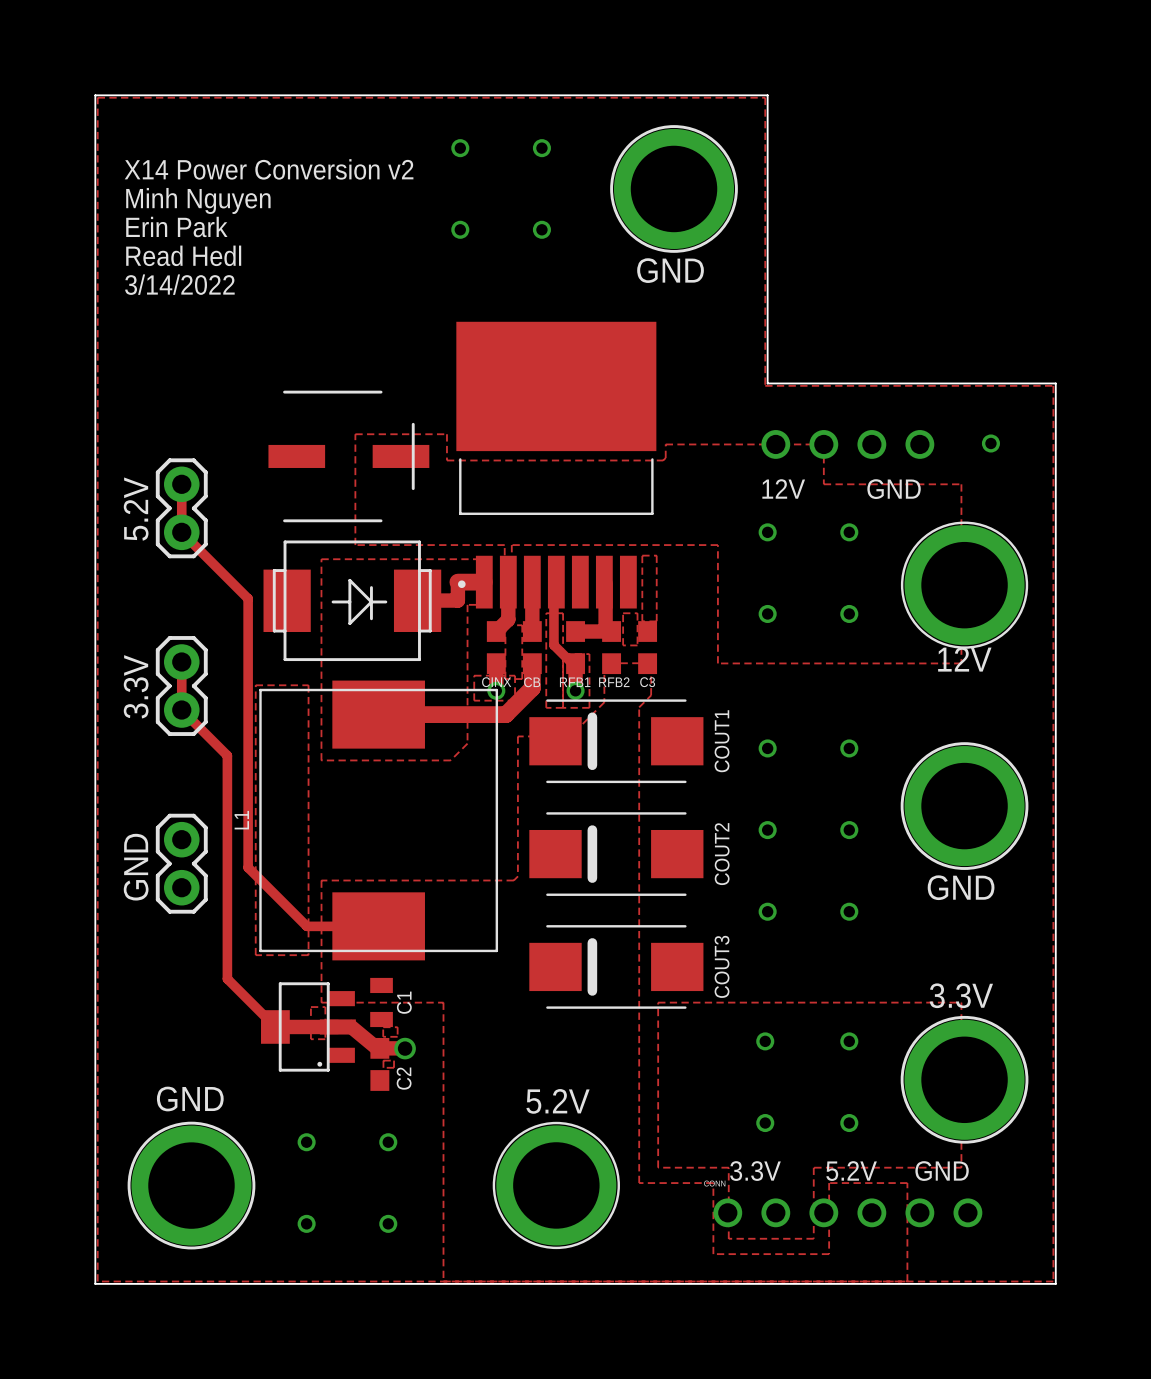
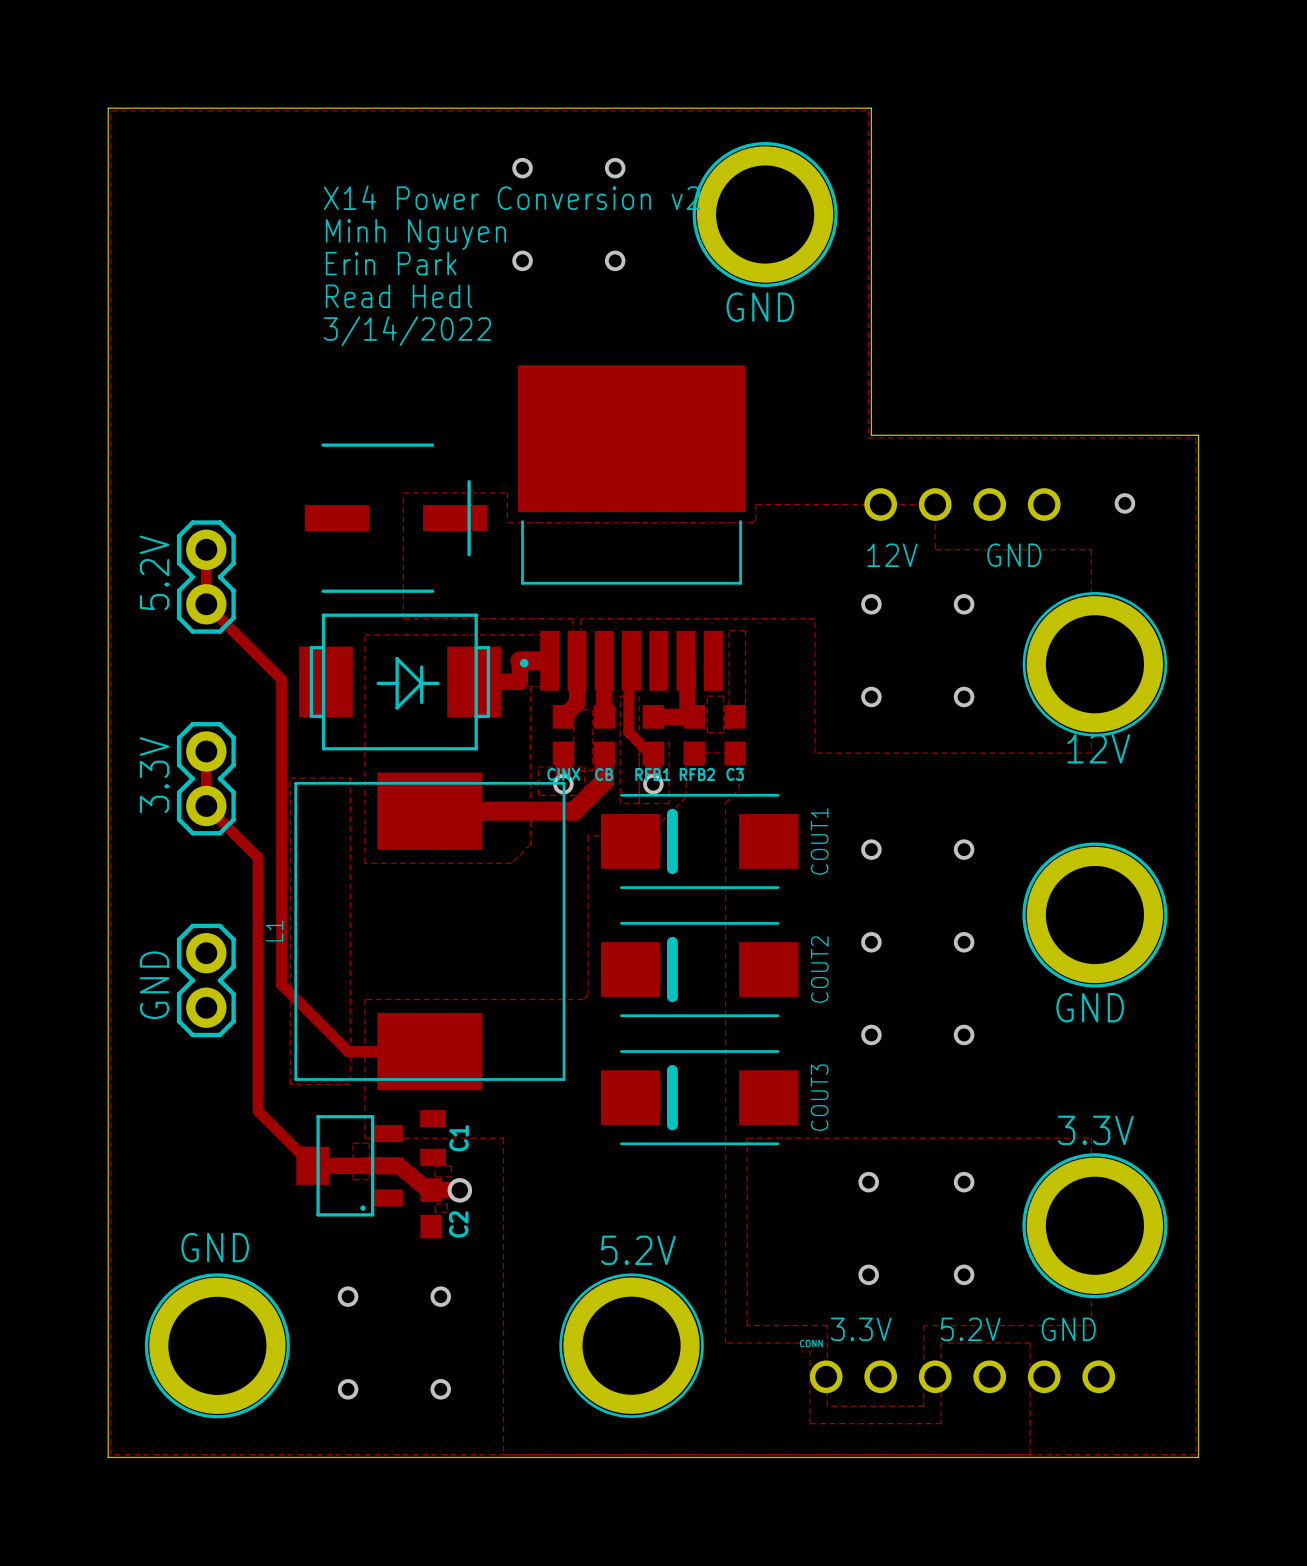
text position: X14 Power Conversion v2 (269, 169) -> X14 Power Conversion v2 (512, 197)
text position: Minh Nguyen (198, 200) -> Minh Nguyen (415, 234)
text position: Erin Park (176, 227) -> Erin Park (391, 263)
text position: Read Hedl (183, 255) -> Read Hedl (399, 296)
text position: 3/14/2022 (179, 284) -> 3/14/2022 (407, 331)

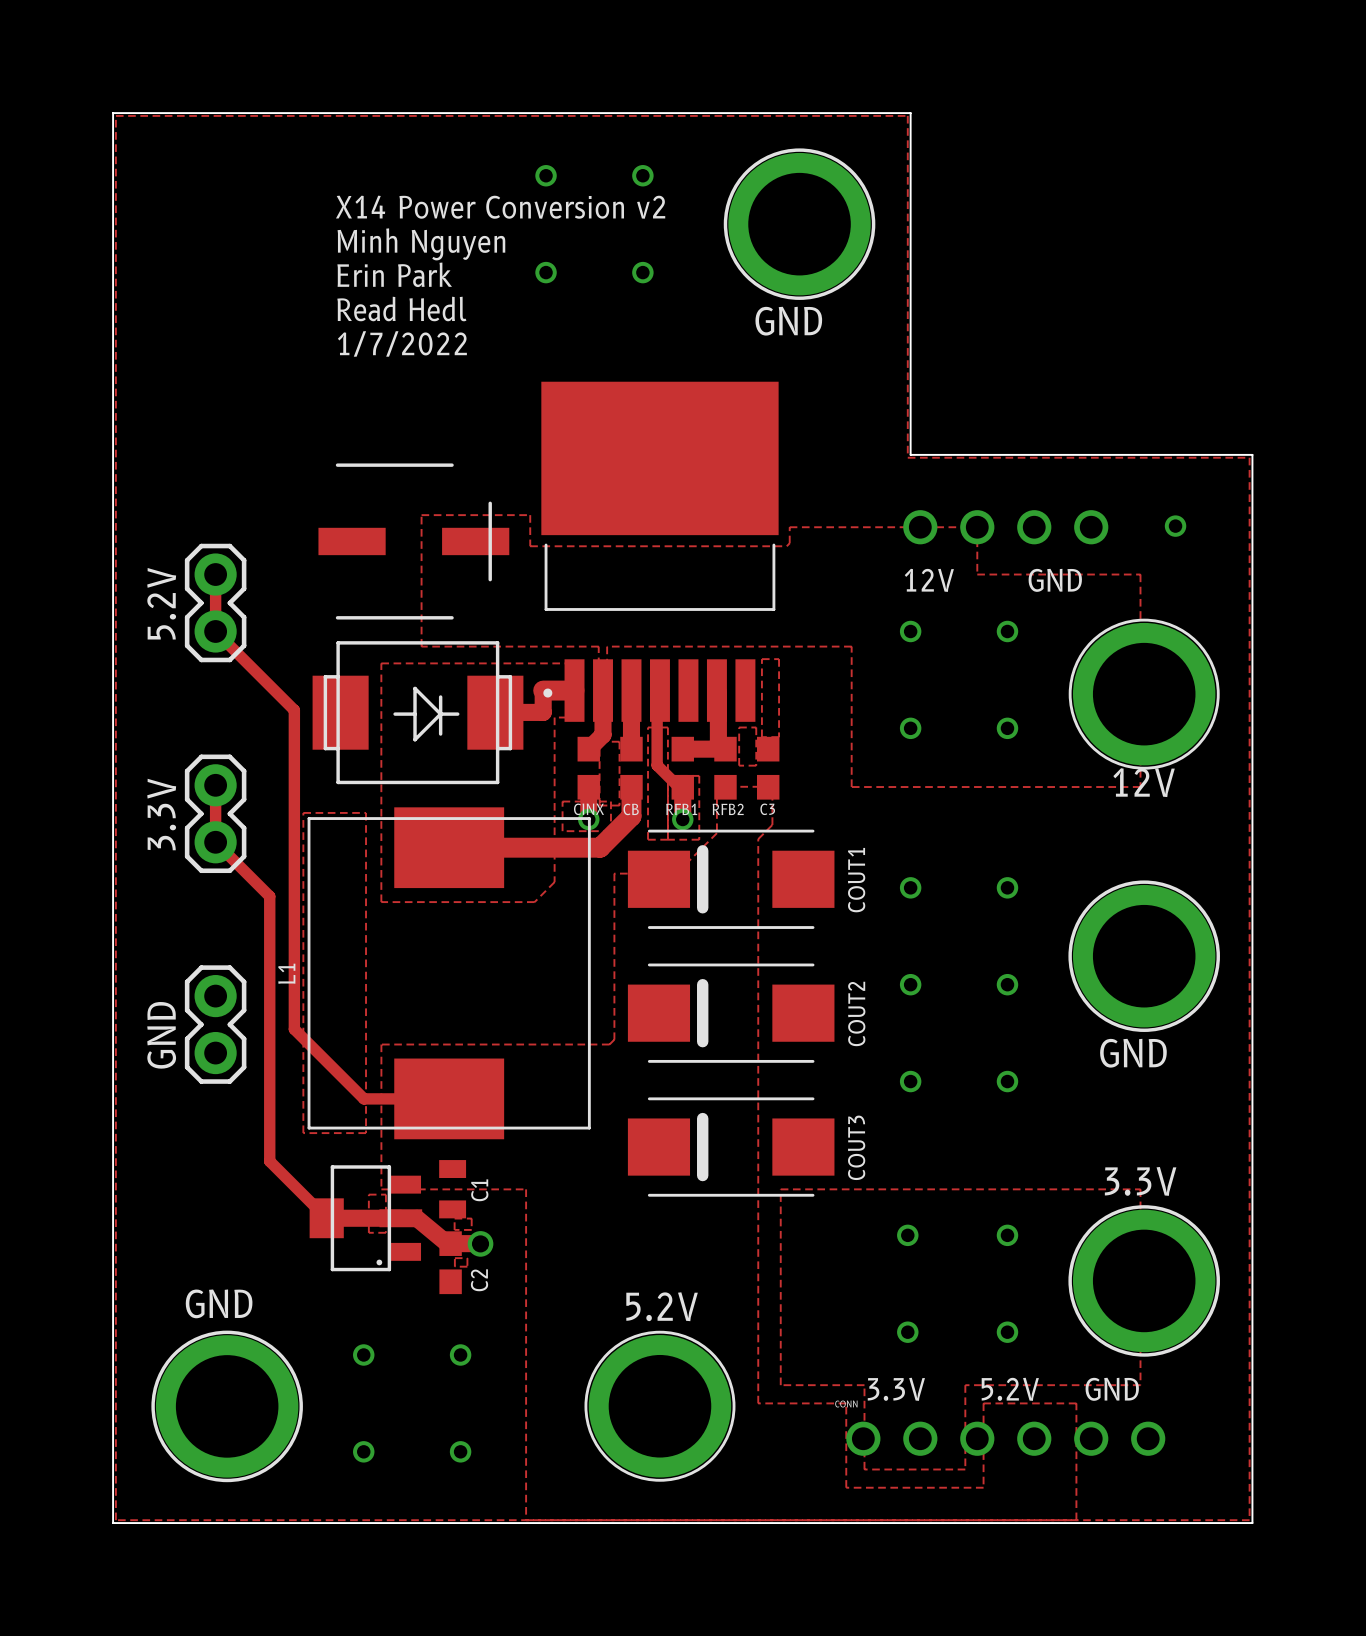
text: 3/14/2022 (407, 331) -> 1/7/2022 (402, 343)

